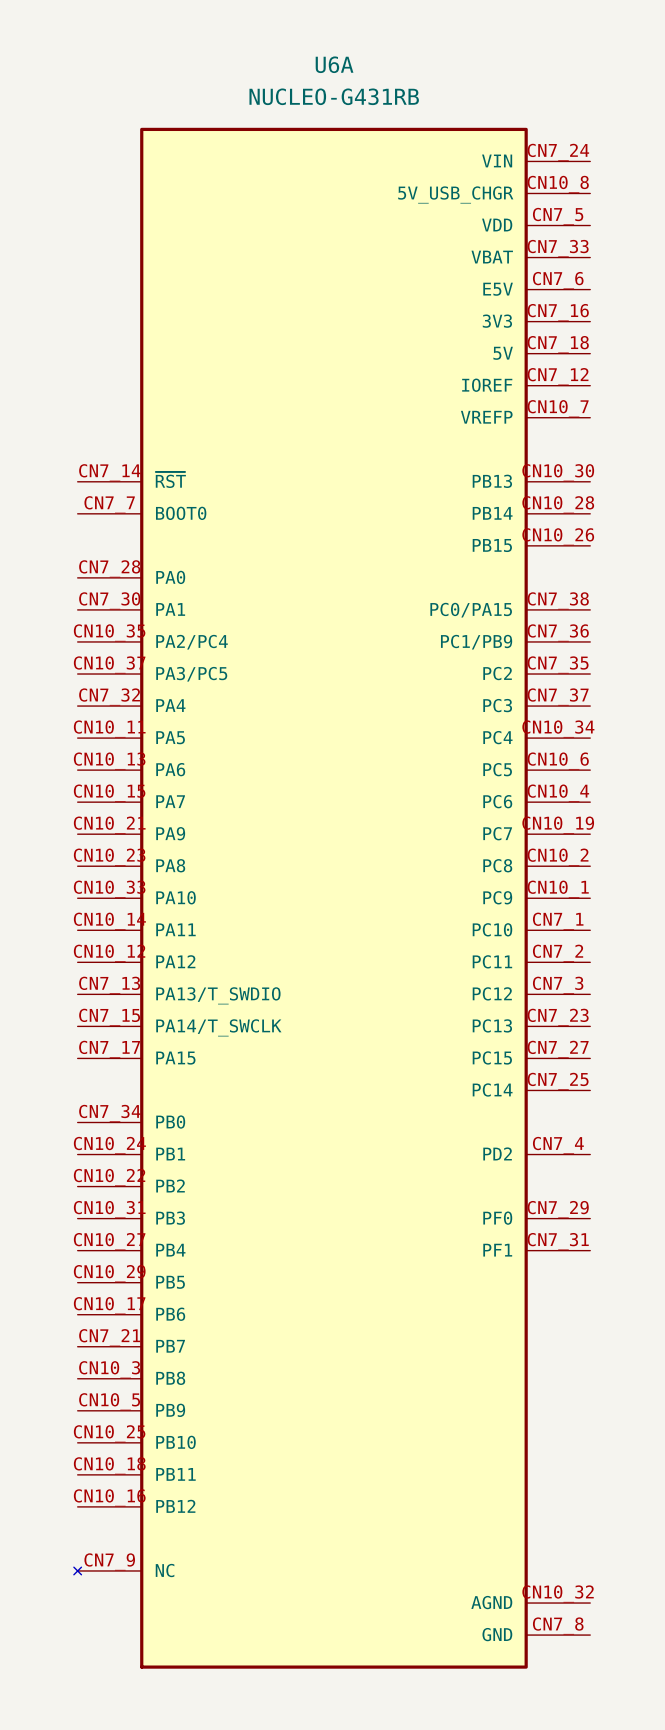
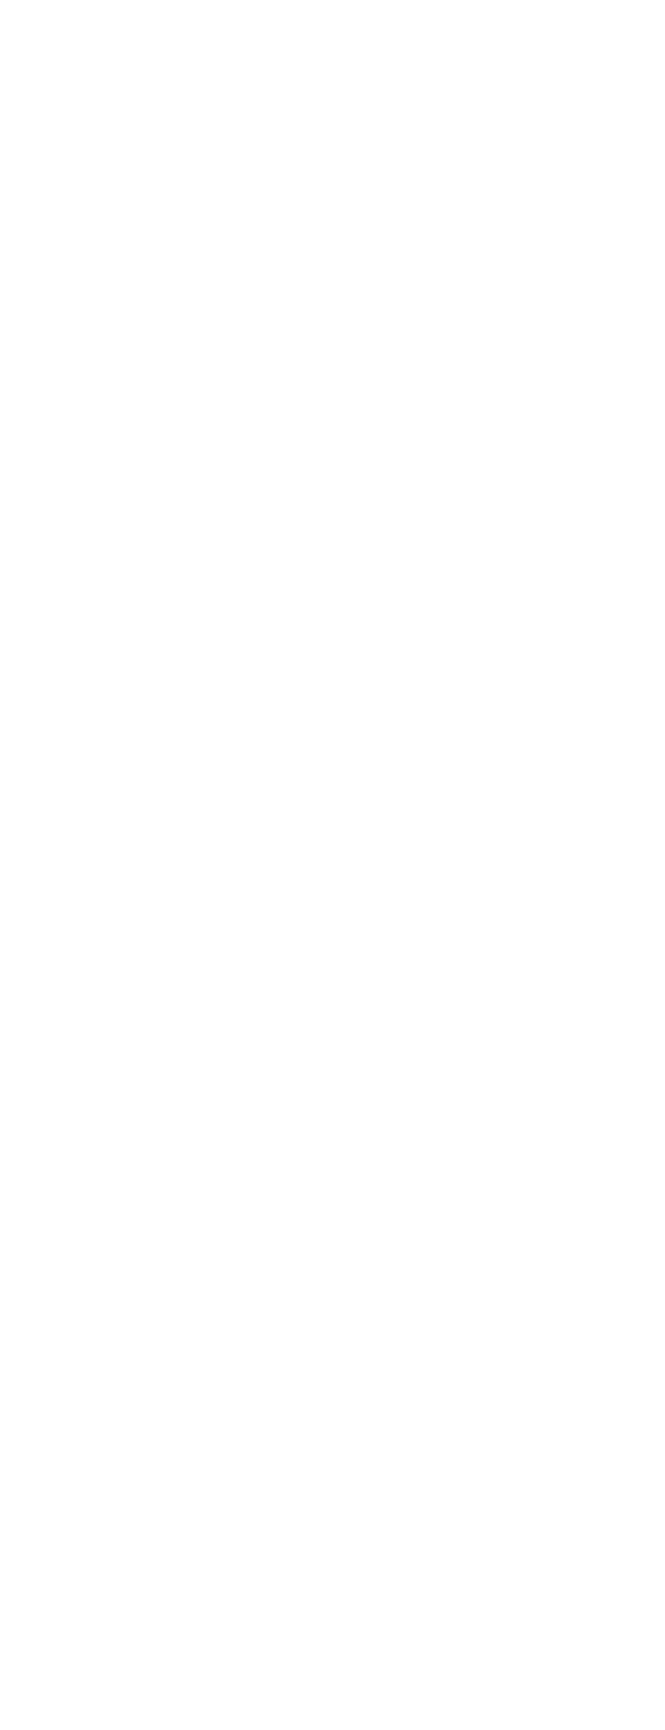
U6A: NUCLEO-G431RB (332, 898) -> none

